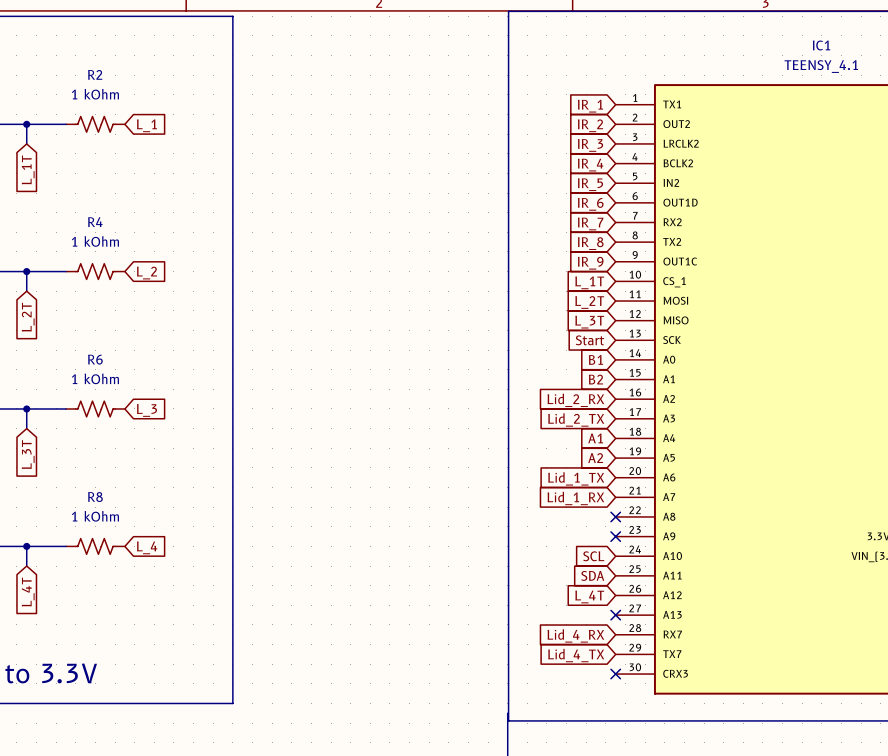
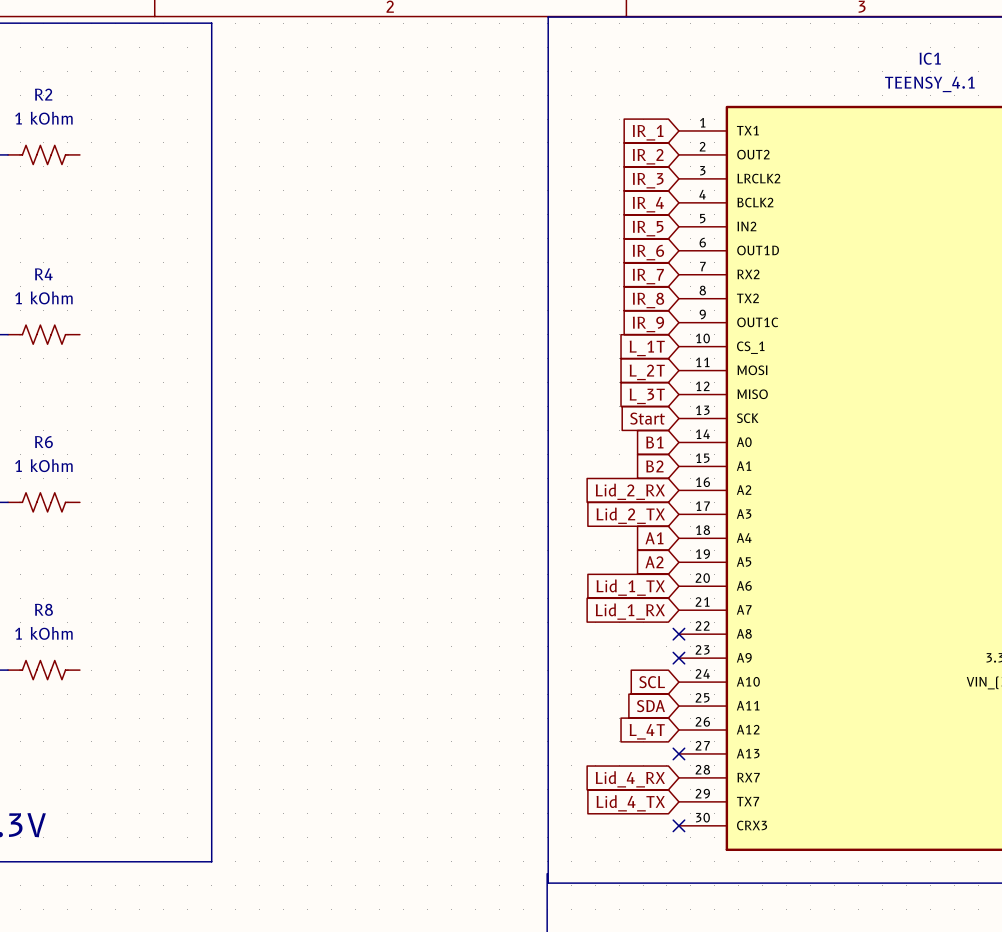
global label: L_1 (146, 125) -> none
global label: L_2 (146, 273) -> none
global label: L_3 (146, 410) -> none
global label: L_4 (147, 547) -> none

